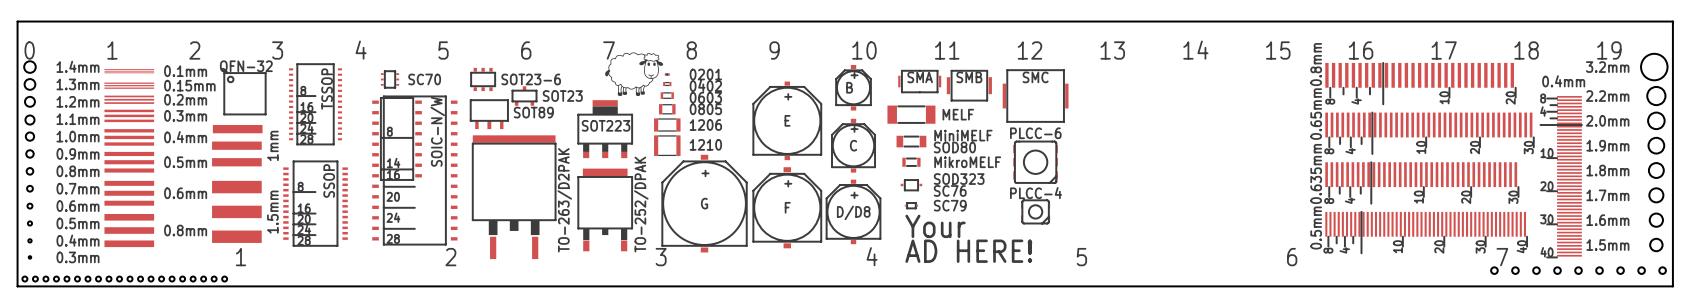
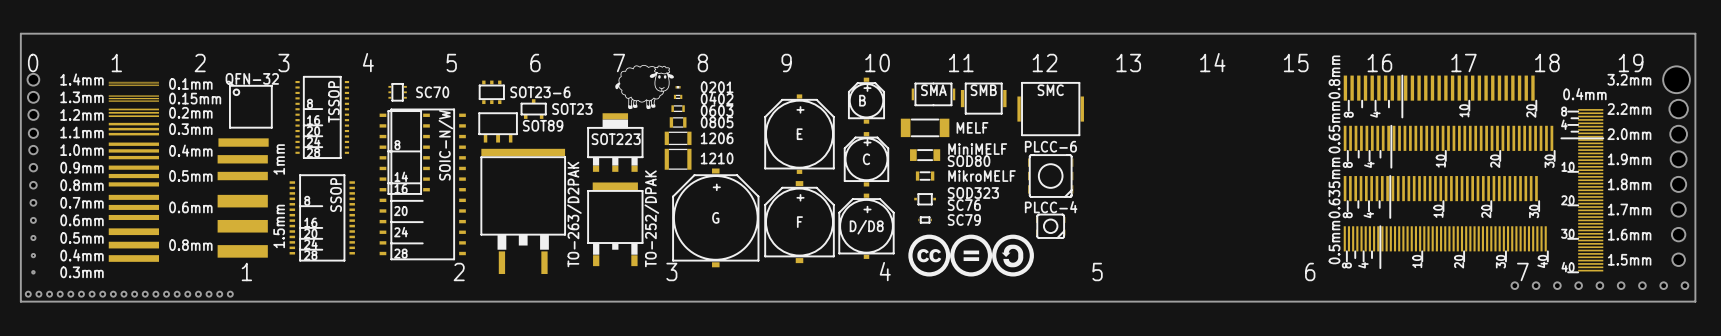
drawing: none -> [908, 234, 1034, 277]
text: Your (935, 226) -> none
text: AD HERE! (968, 251) -> none

